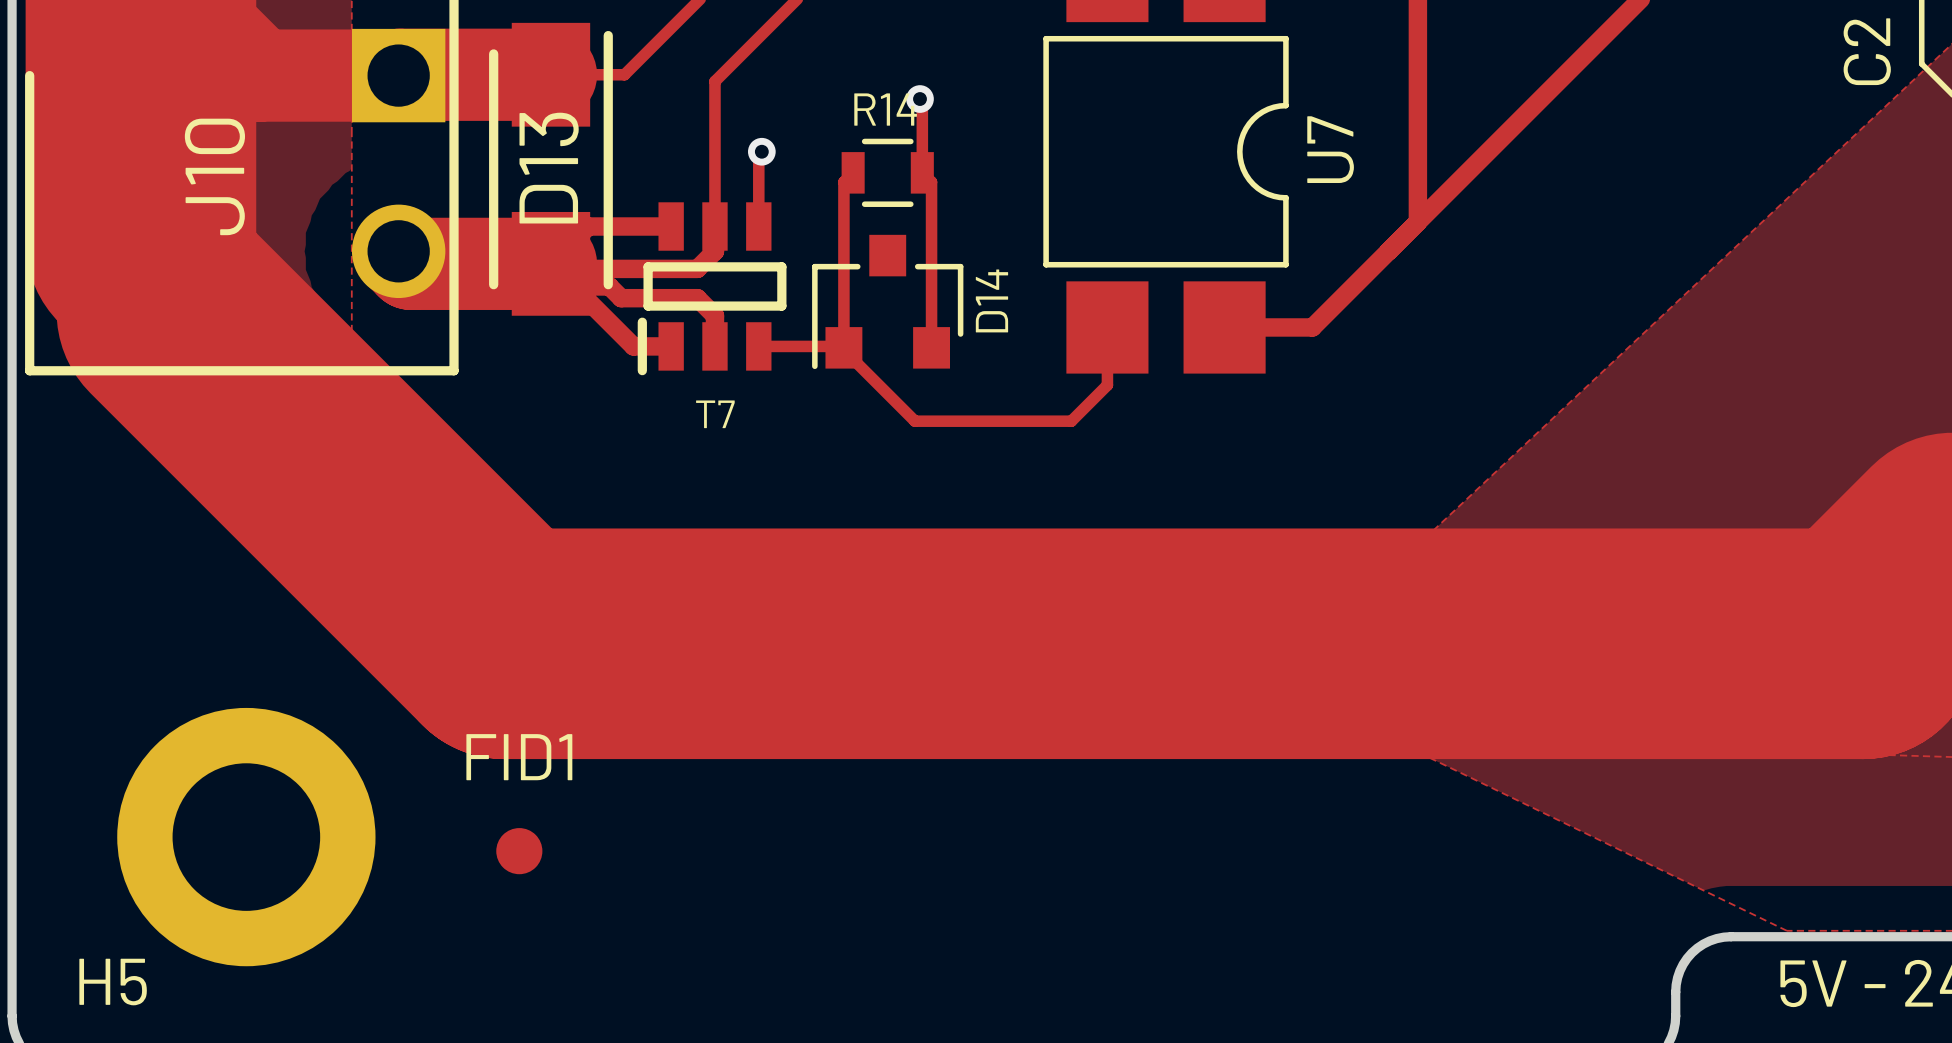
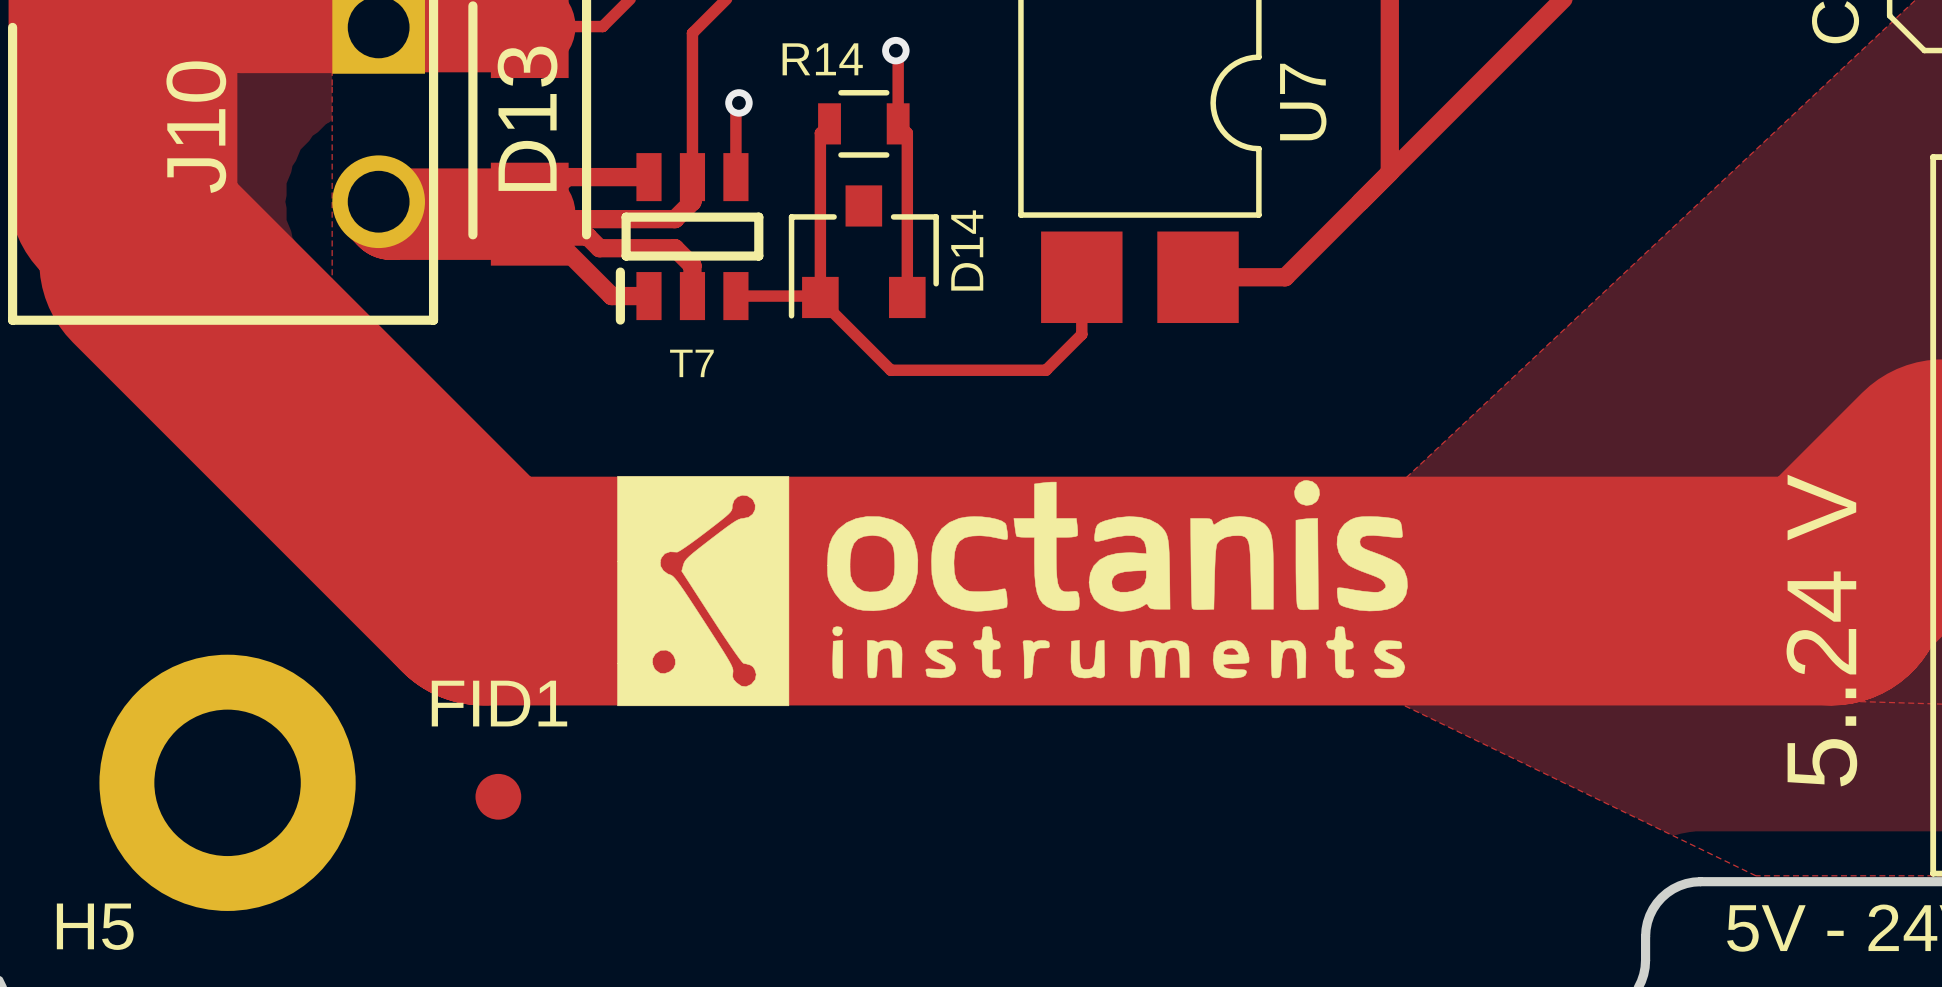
R14 name position: R14 (885, 109) -> R14 (822, 59)
drawing: none -> [617, 476, 1408, 707]
text: none -> 5..24 V (1821, 630)

